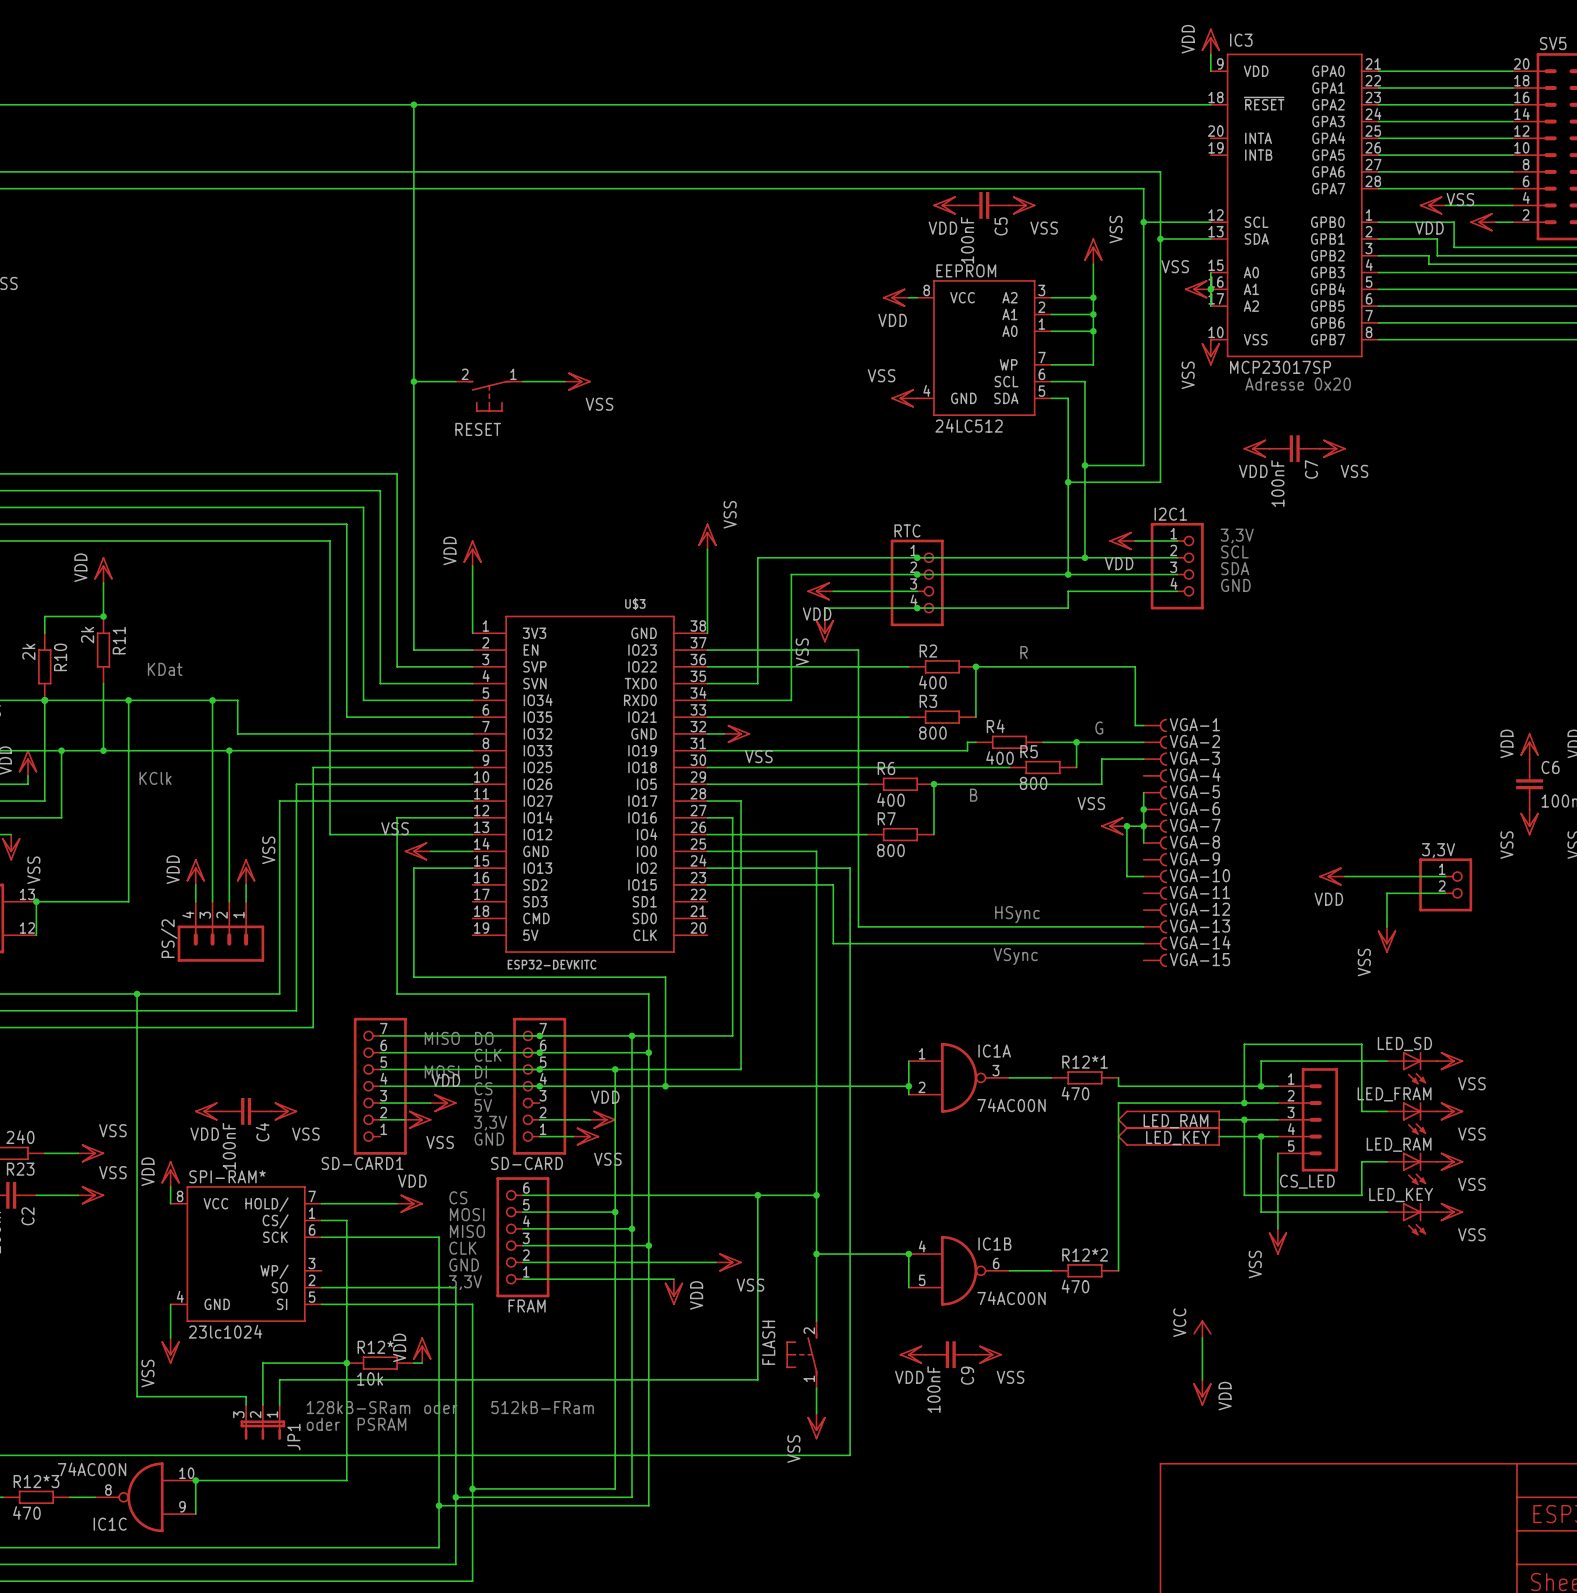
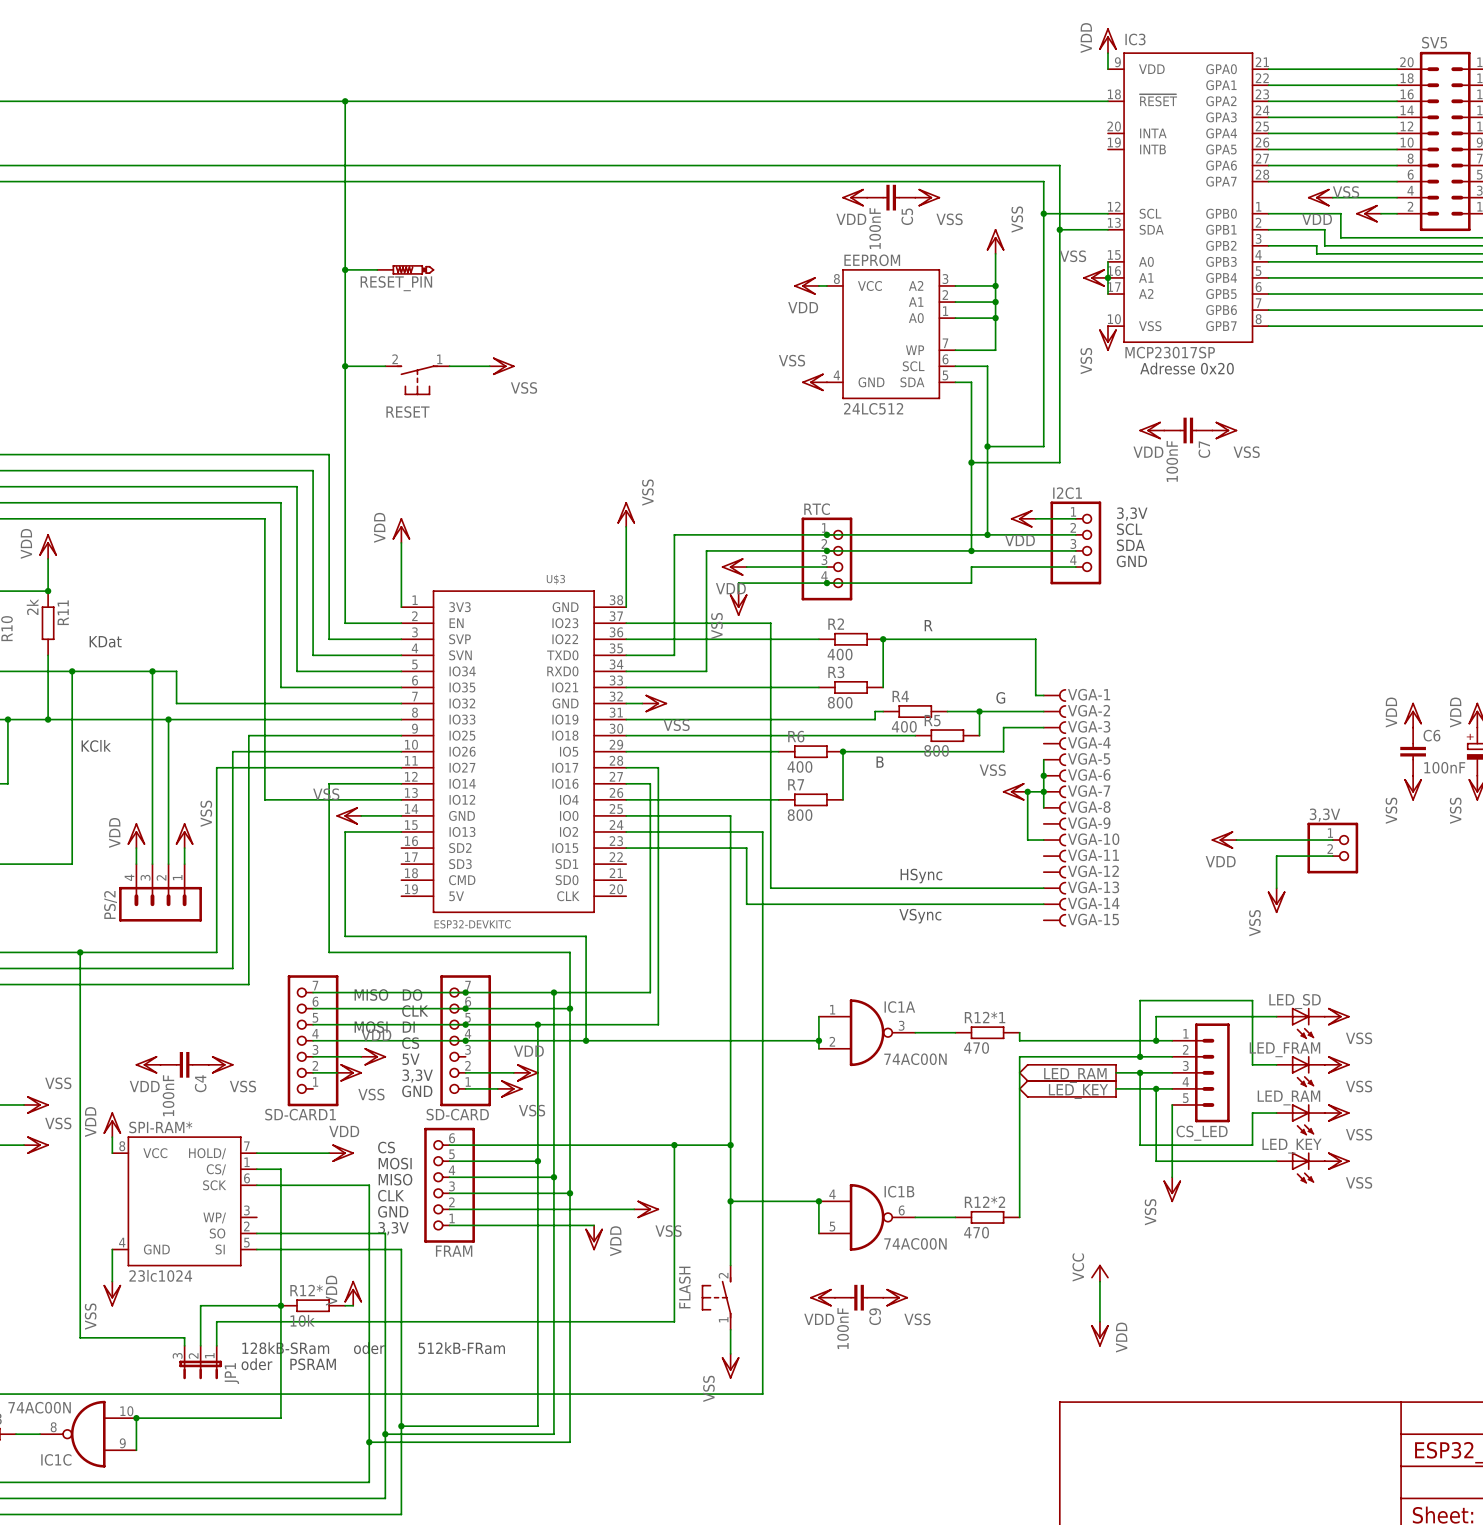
wire: none -> (345, 269) (377, 269)
junction: none -> (345, 269)
RESET_PIN: none -> (405, 269)

